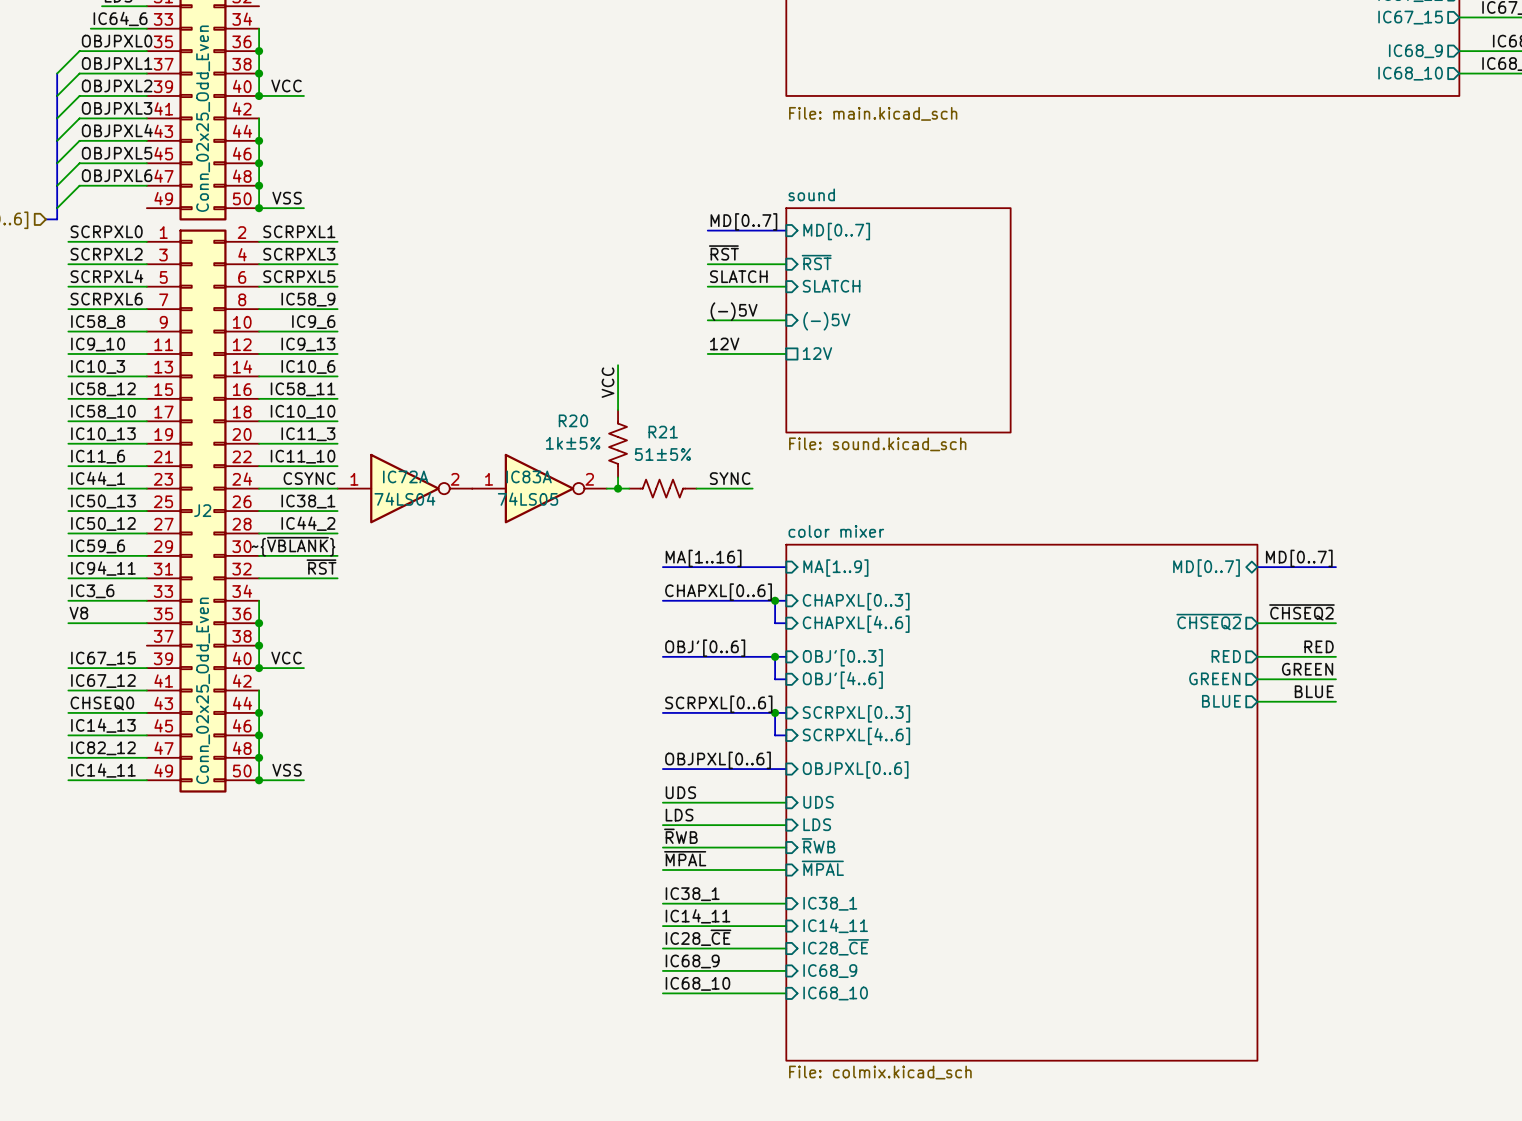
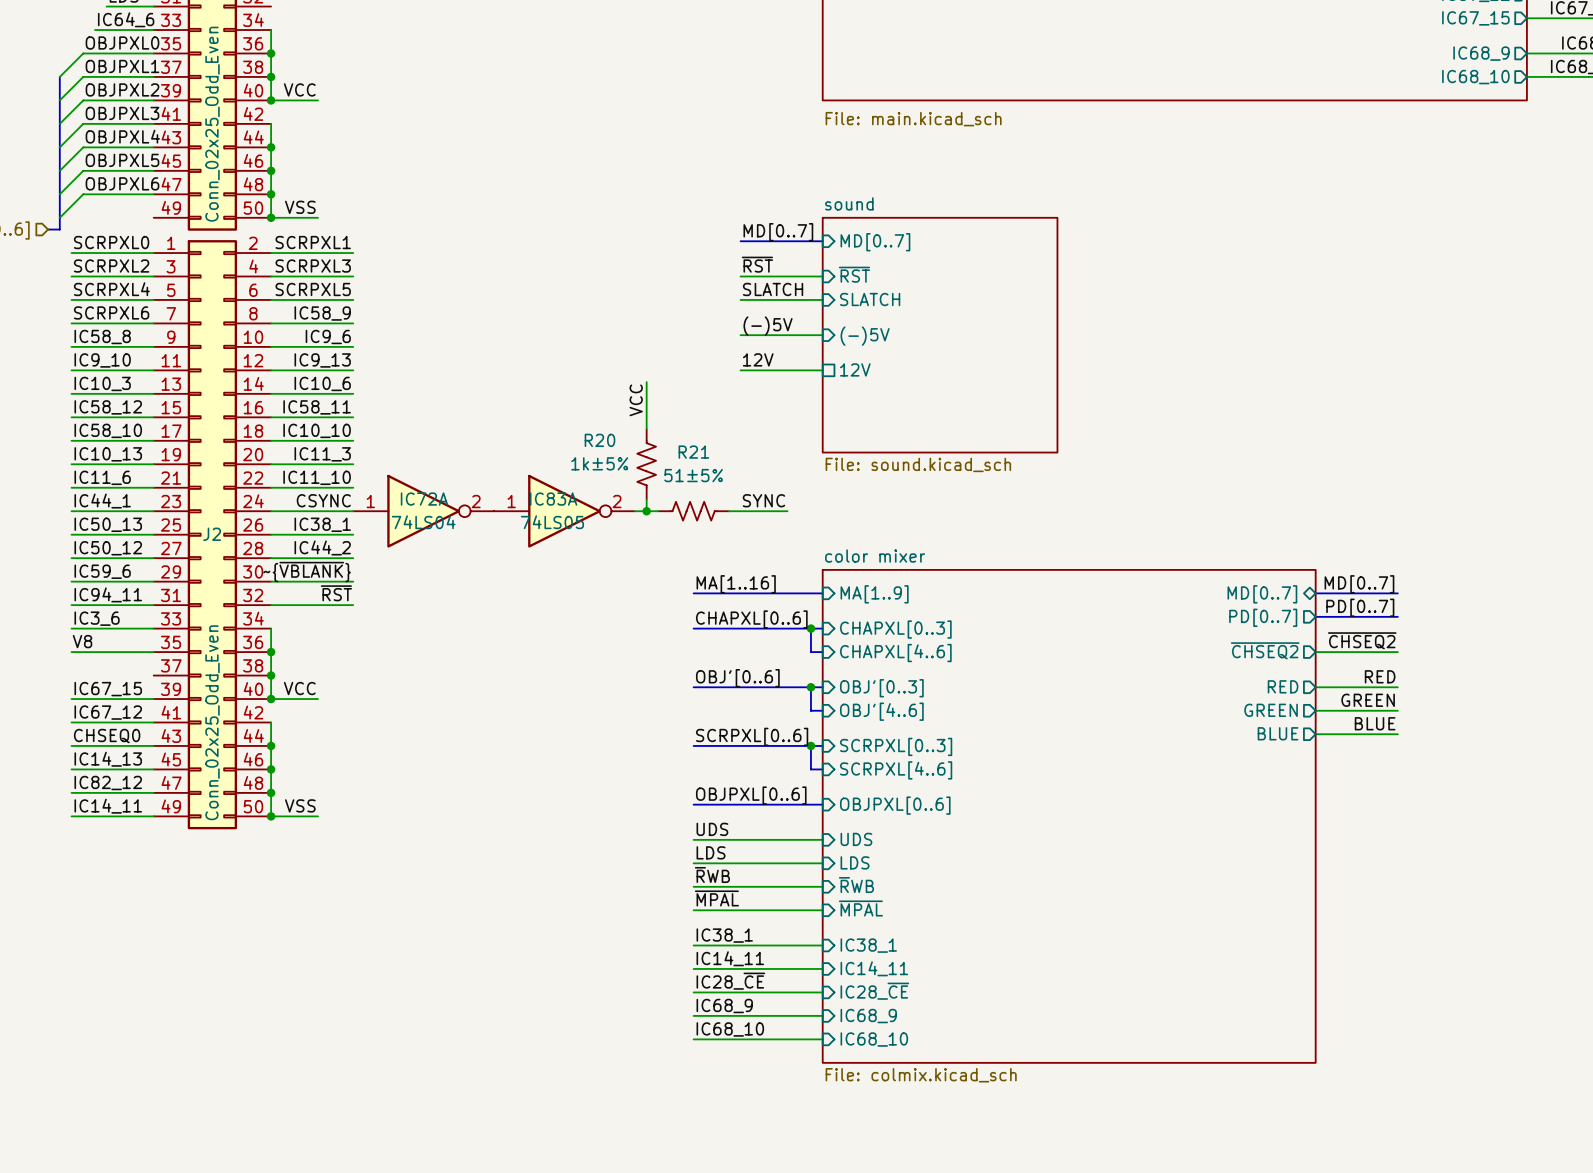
label: none -> PD[0..7] (1360, 607)
bus: none -> (1315, 616) (1397, 616)
sheet pin: none -> PD[0..7] (1263, 617)
sheet color mixer: none -> File: colmix.kicad_sch (1069, 816)
sheet color mixer: File: colmix.kicad_sch (1021, 802) -> none

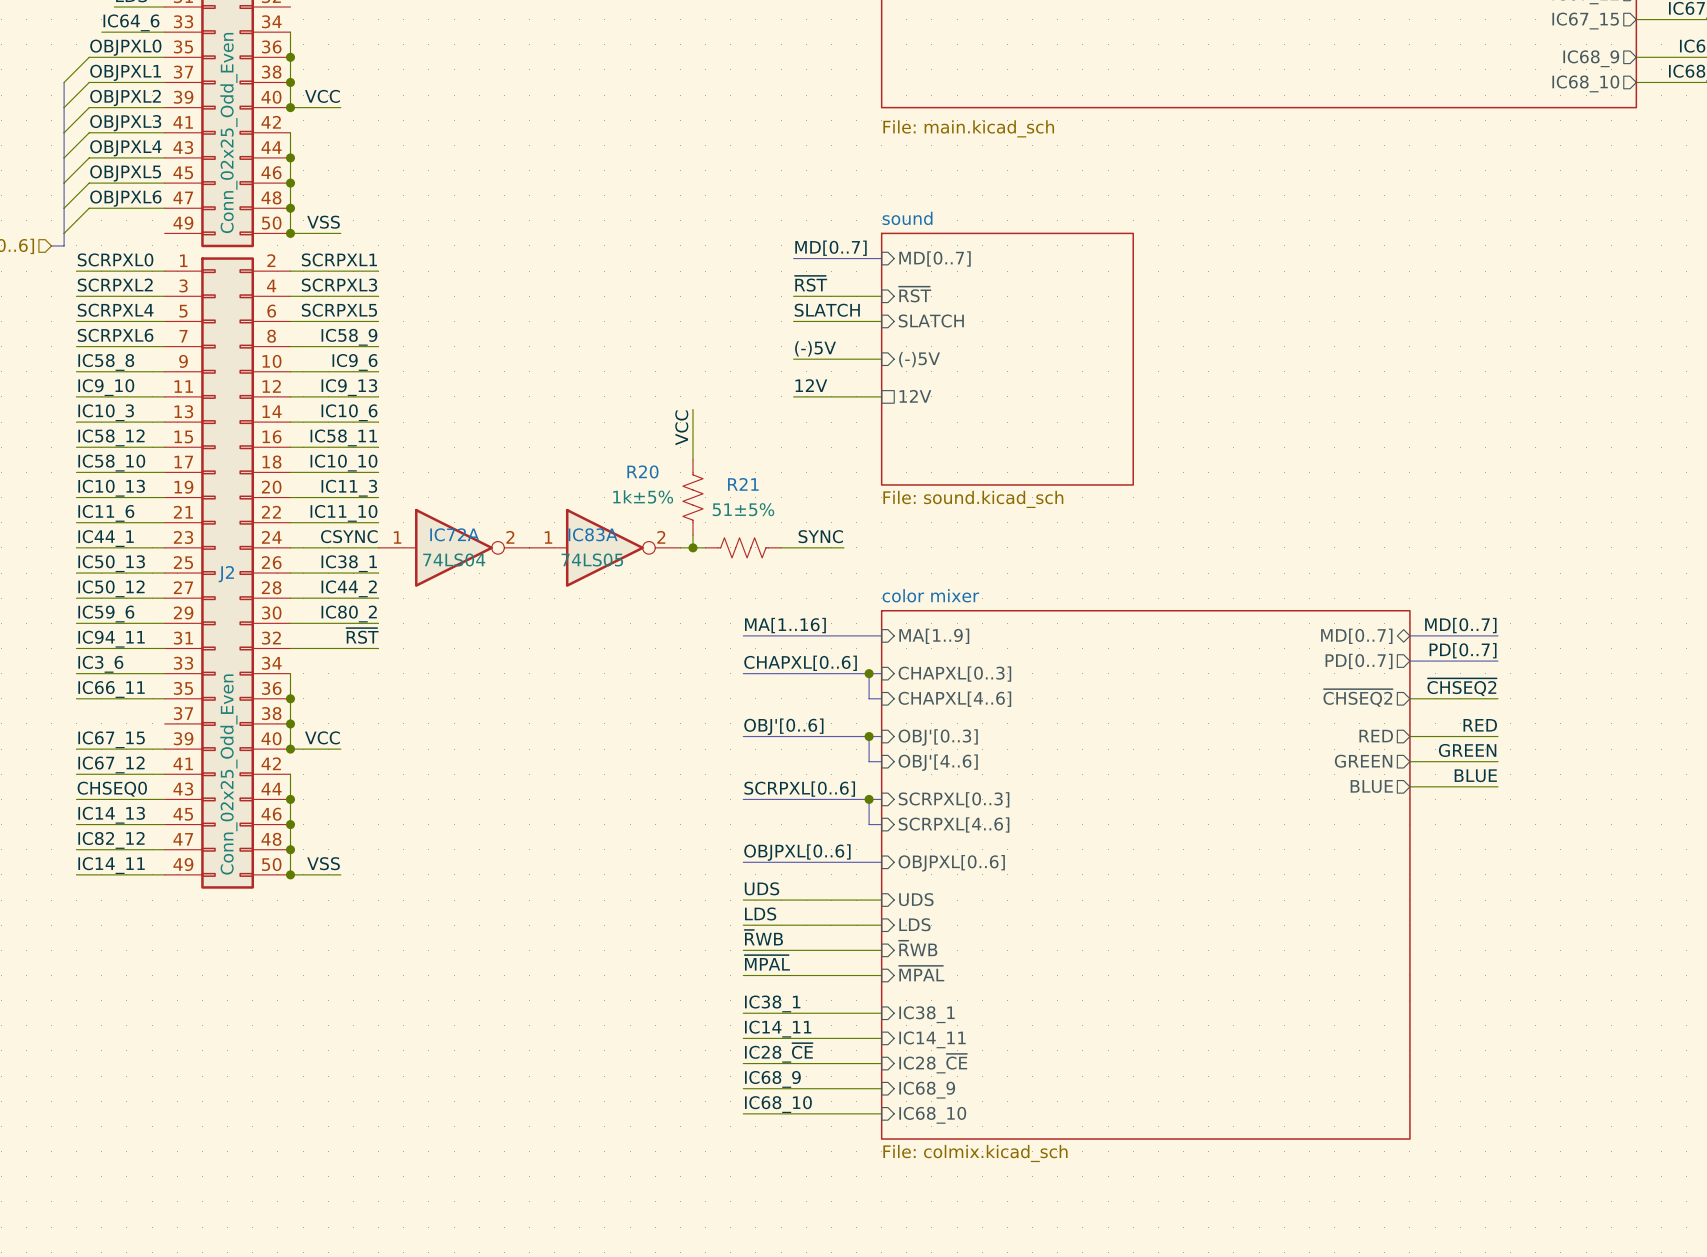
label: ~{~{VBLANK}} (307, 572) -> IC80_2 (349, 614)
label: V8 (82, 641) -> IC66_11 (111, 689)

